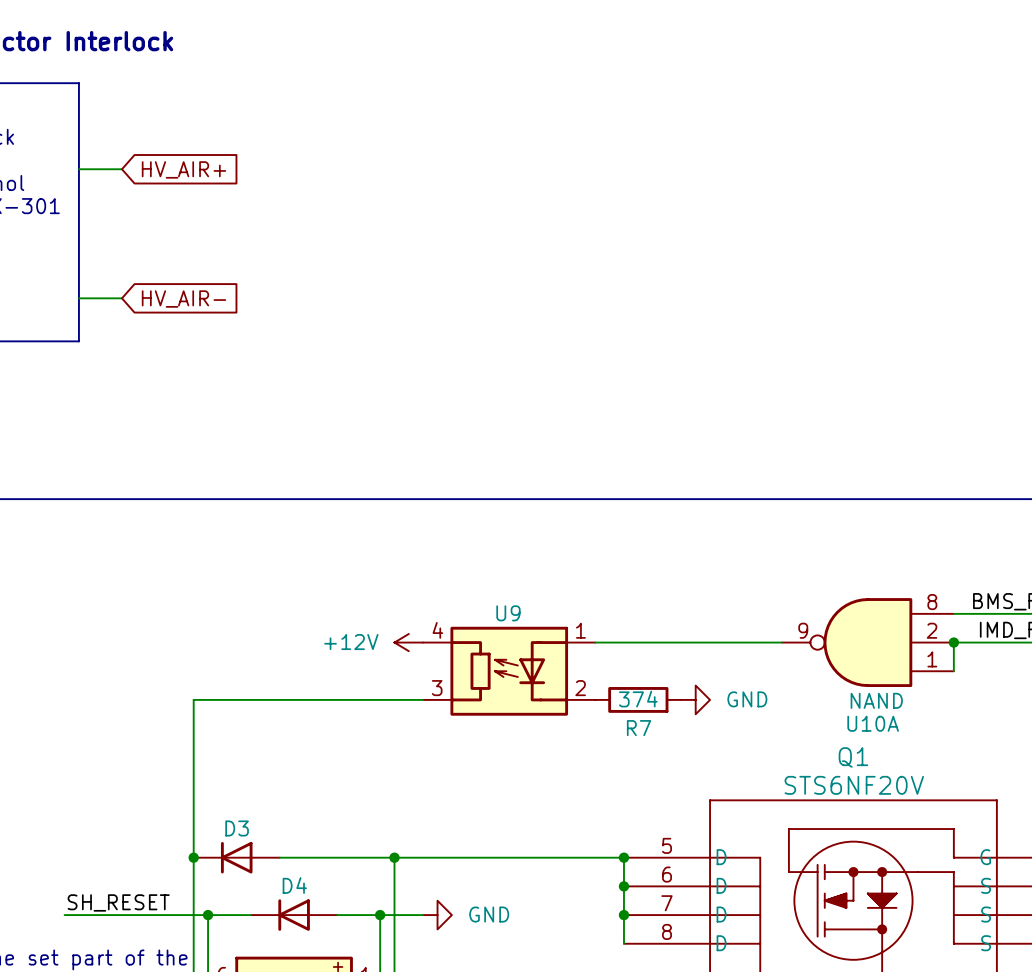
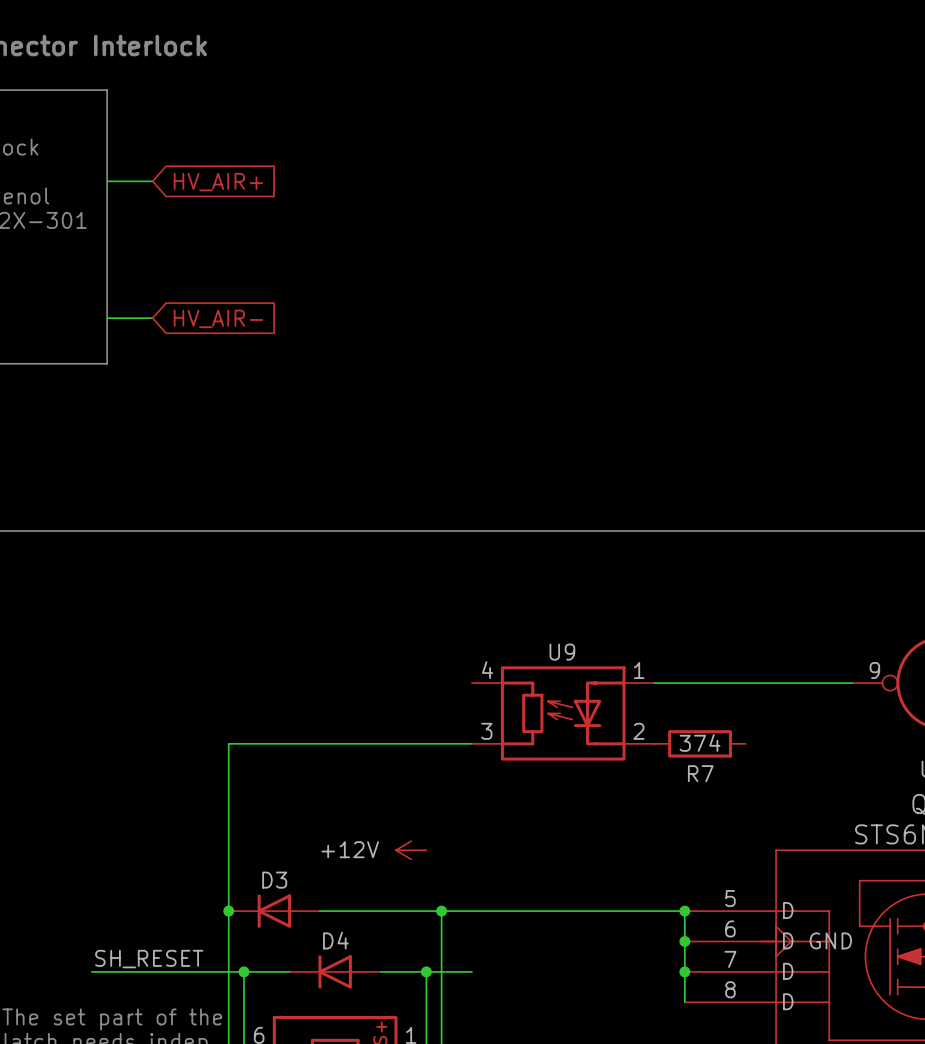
power symbol position: +12V (408, 642) -> +12V (411, 850)
power symbol: GND (695, 699) -> none
power symbol: none -> GND (776, 941)
power symbol: GND (437, 915) -> none

